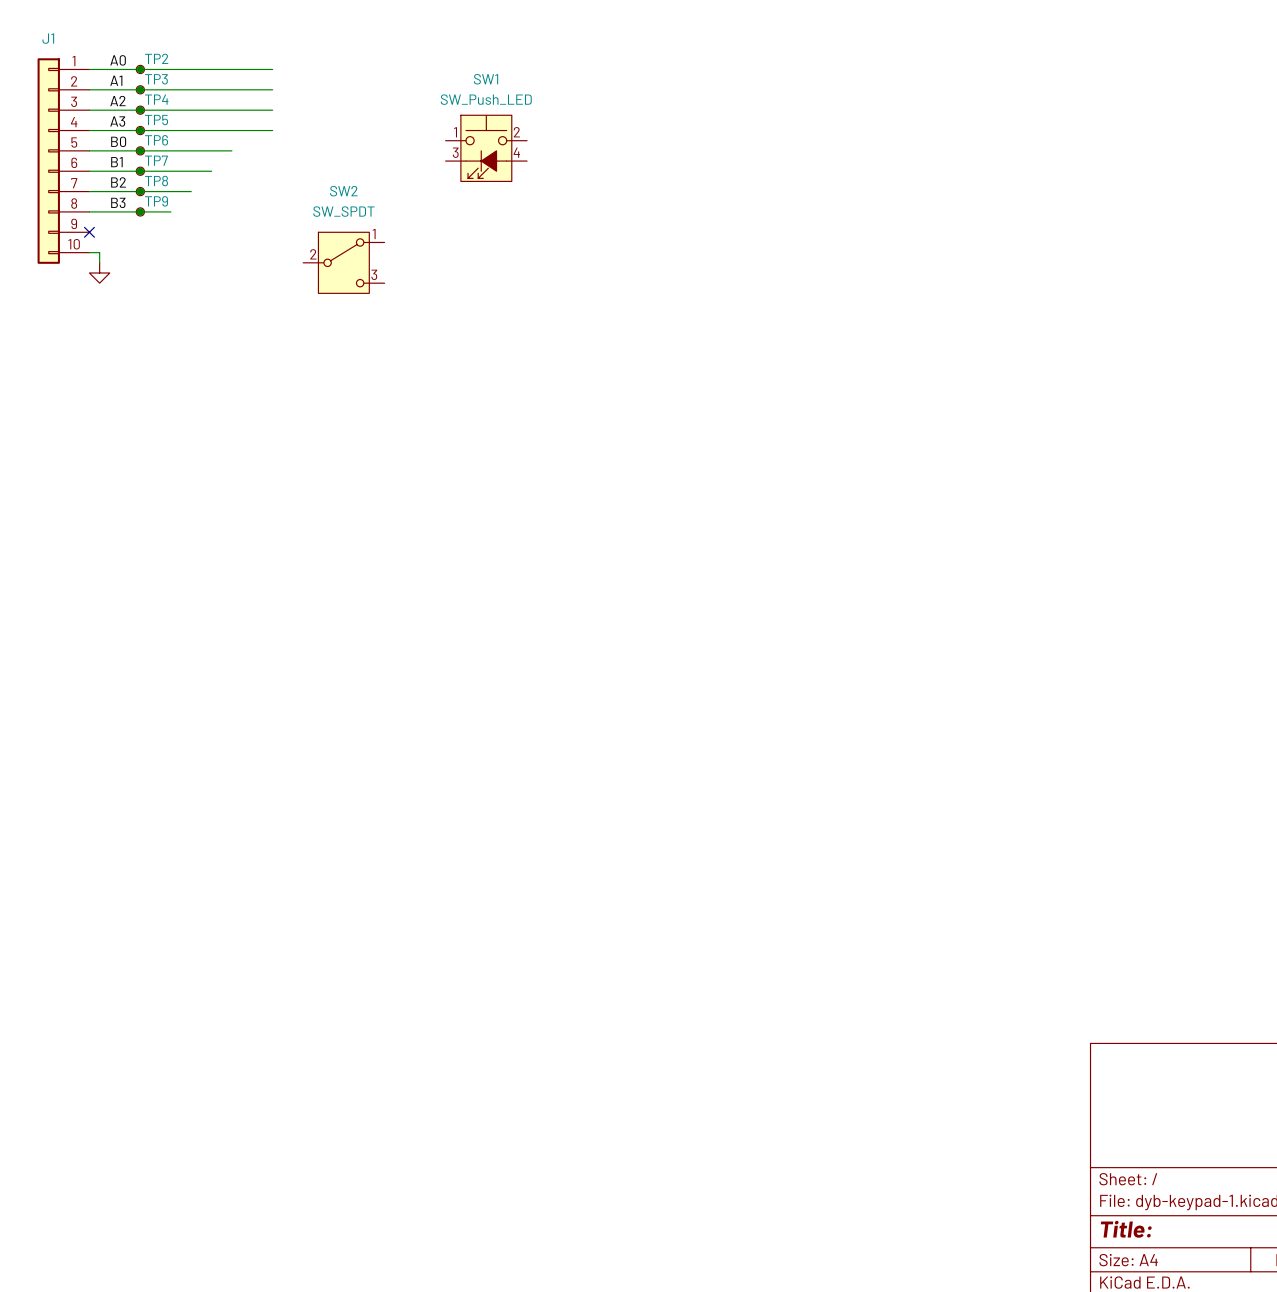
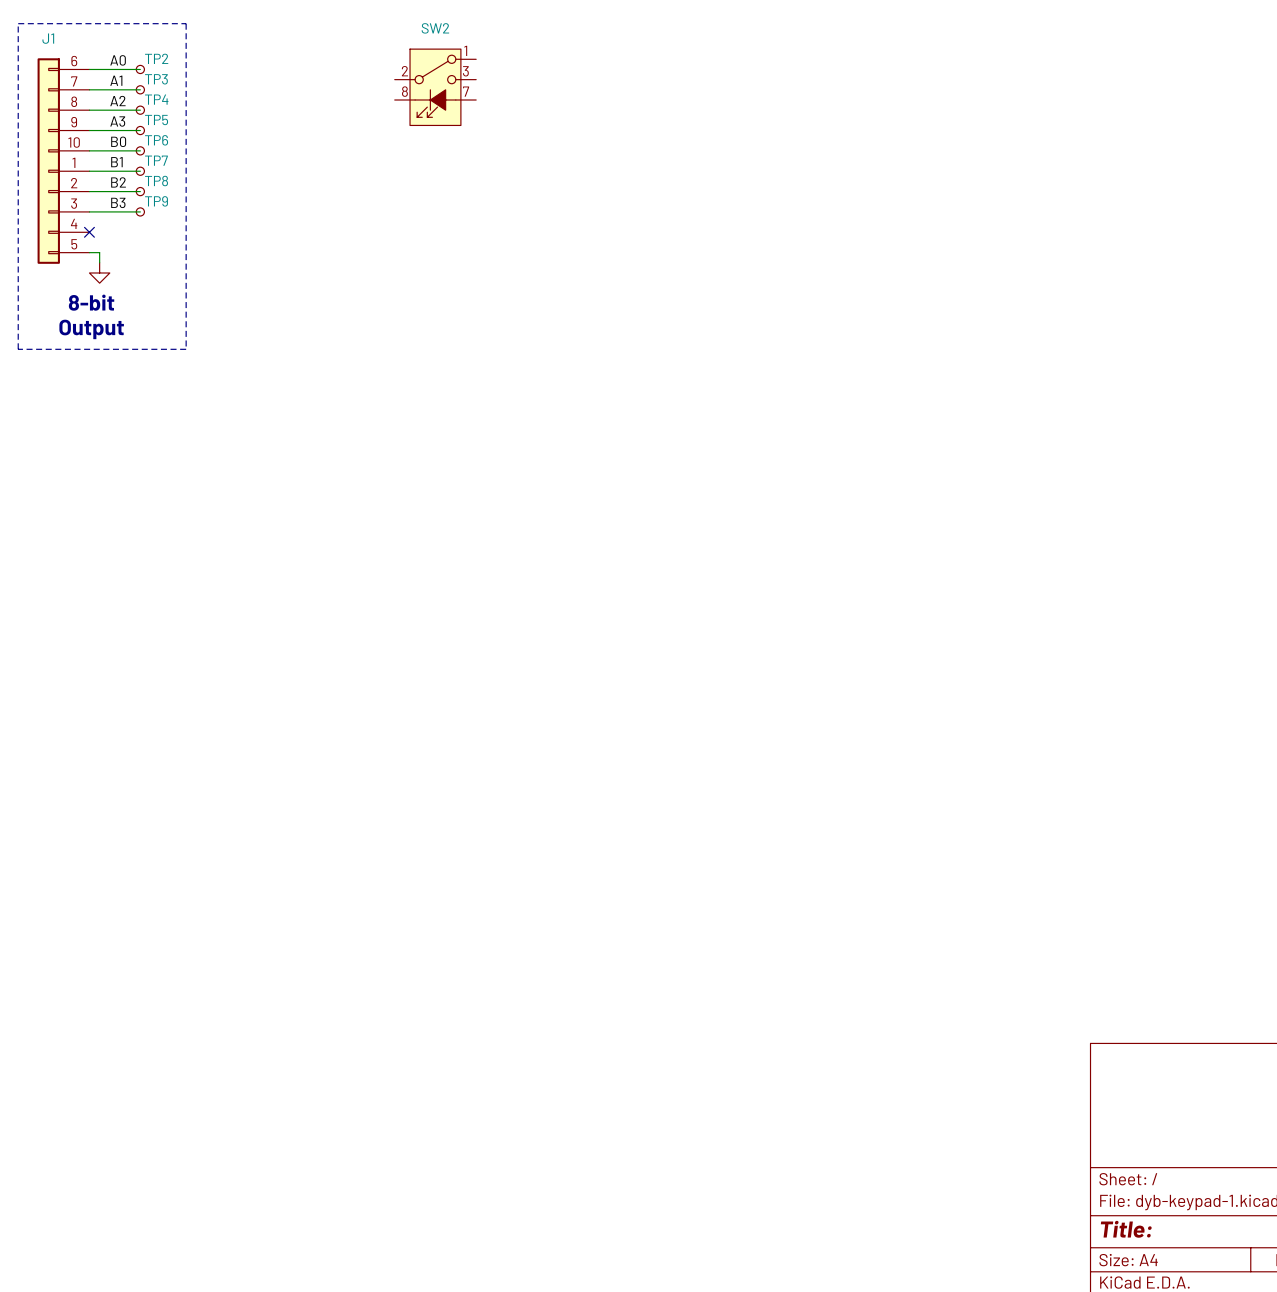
line: none -> (18, 23) (186, 23) (186, 349) (18, 349) (18, 23)
J1 symbol: [37, 58, 90, 264] -> [37, 58, 90, 264]
wire: (140, 69) (272, 69) -> none
junction: (140, 69) -> none
wire: (140, 89) (272, 89) -> none
junction: (140, 89) -> none
wire: (140, 110) (272, 110) -> none
junction: (140, 110) -> none
wire: (140, 130) (272, 130) -> none
junction: (140, 130) -> none
SW1: SW_Push_LED (486, 148) -> none
wire: (140, 150) (231, 150) -> none
junction: (140, 150) -> none
wire: (140, 171) (211, 171) -> none
junction: (140, 171) -> none
wire: (140, 191) (191, 191) -> none
junction: (140, 191) -> none
wire: (140, 211) (170, 211) -> none
junction: (140, 211) -> none
SW2 value: SW_SPDT (343, 211) -> none
SW2 symbol: [303, 232, 385, 294] -> [394, 49, 477, 126]
text: none -> 8-bit (91, 302)
text: none -> Output (91, 329)

